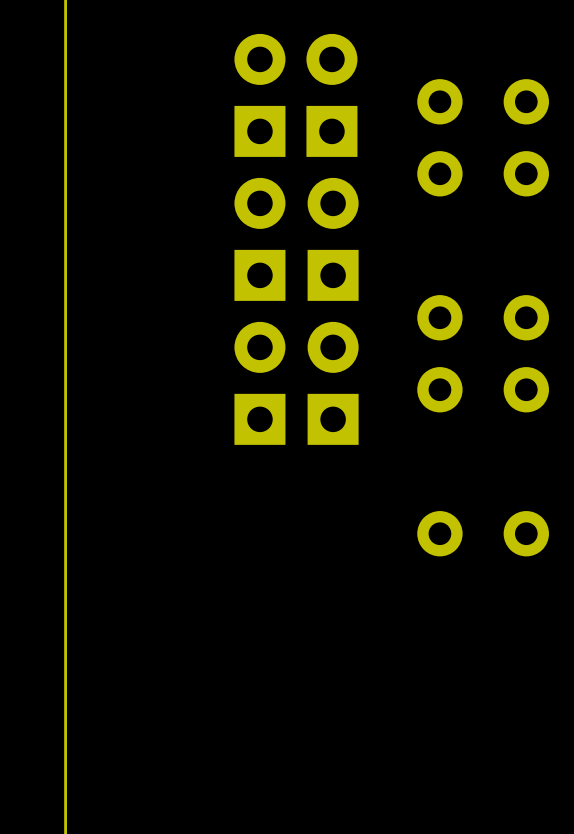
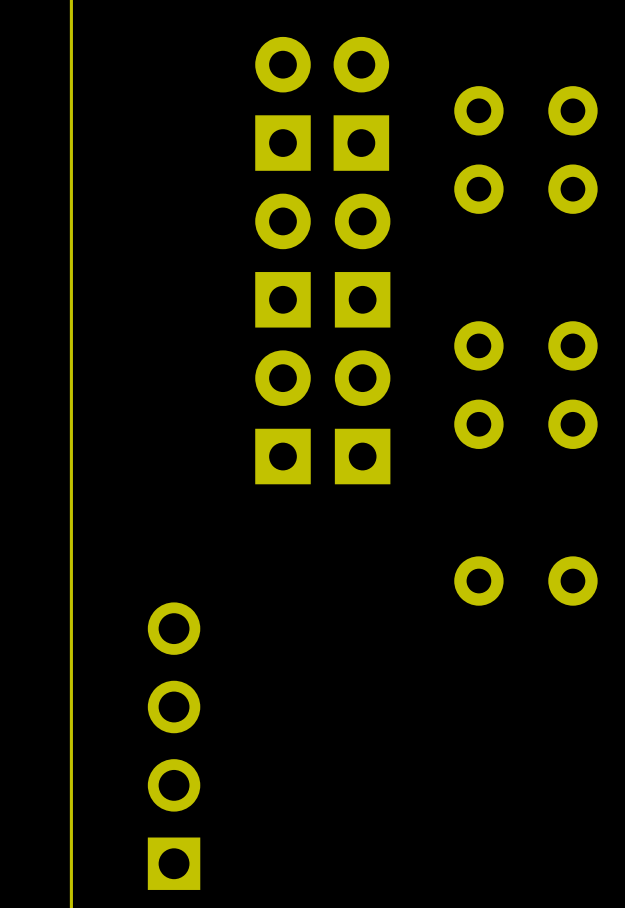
part: none -> (174, 746)

